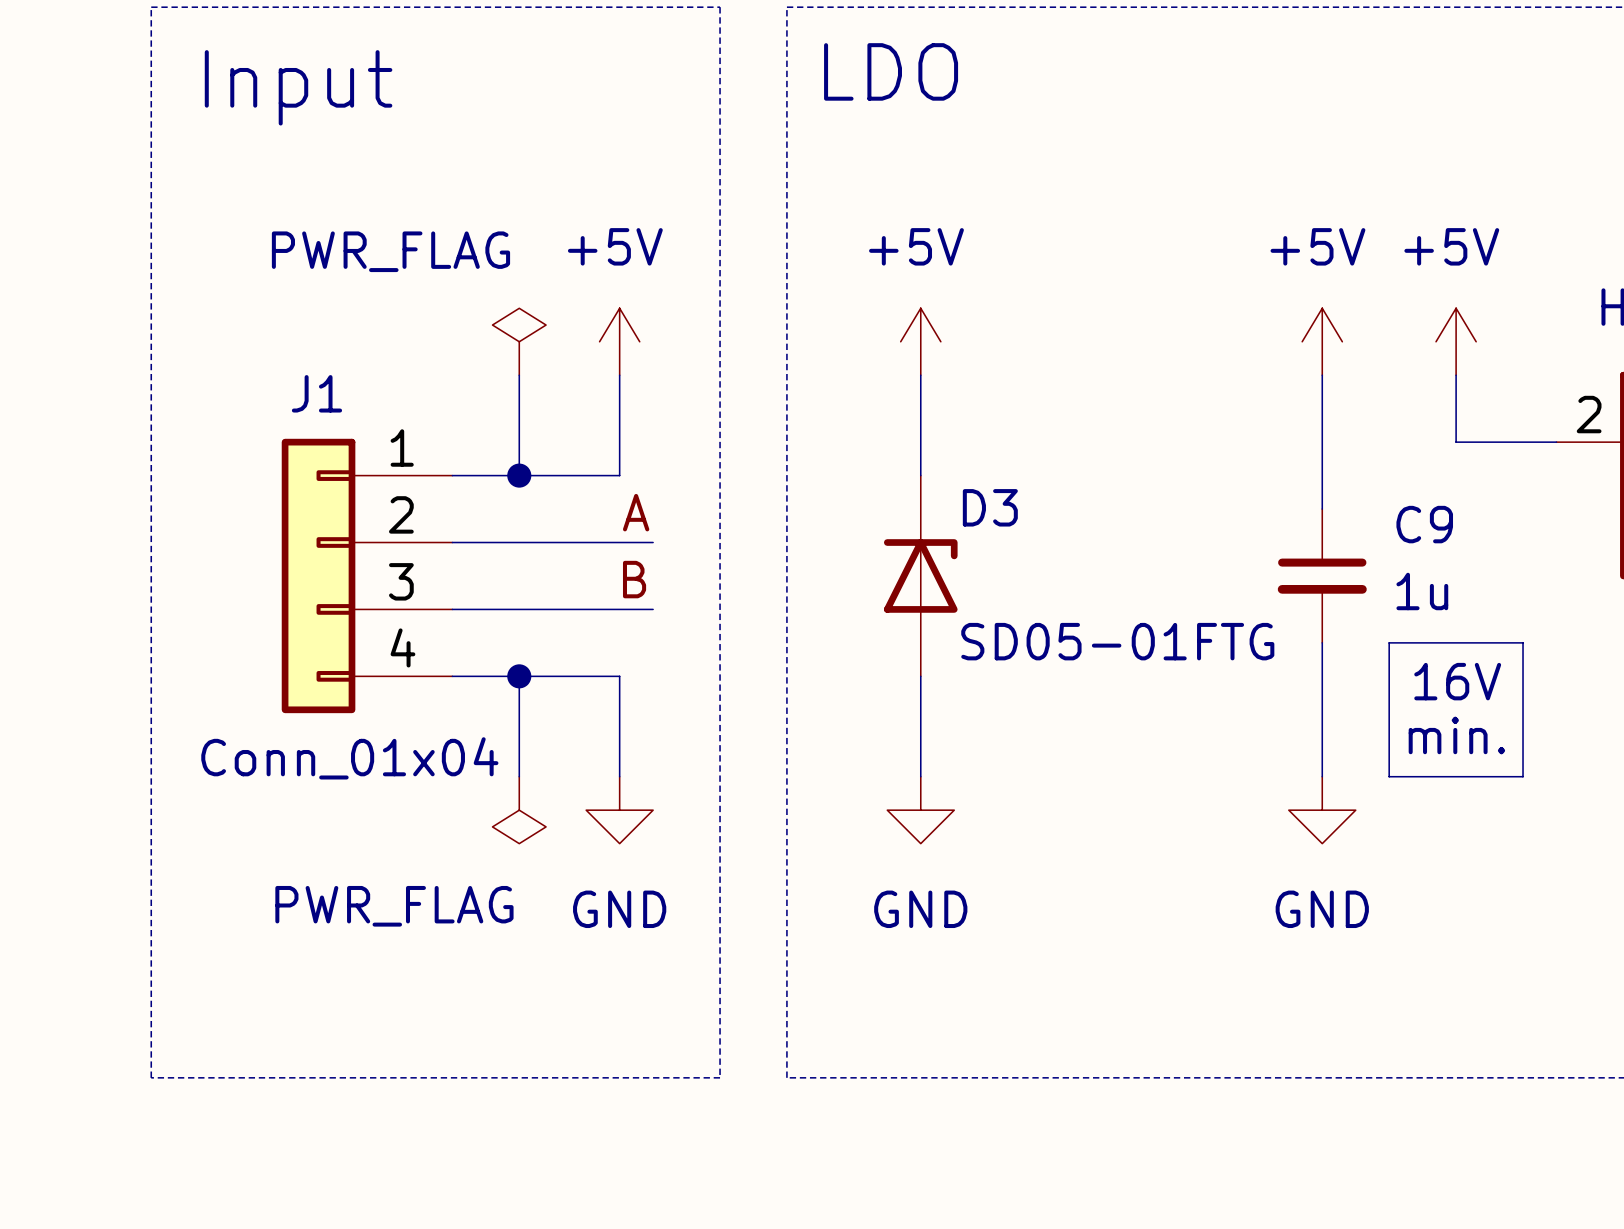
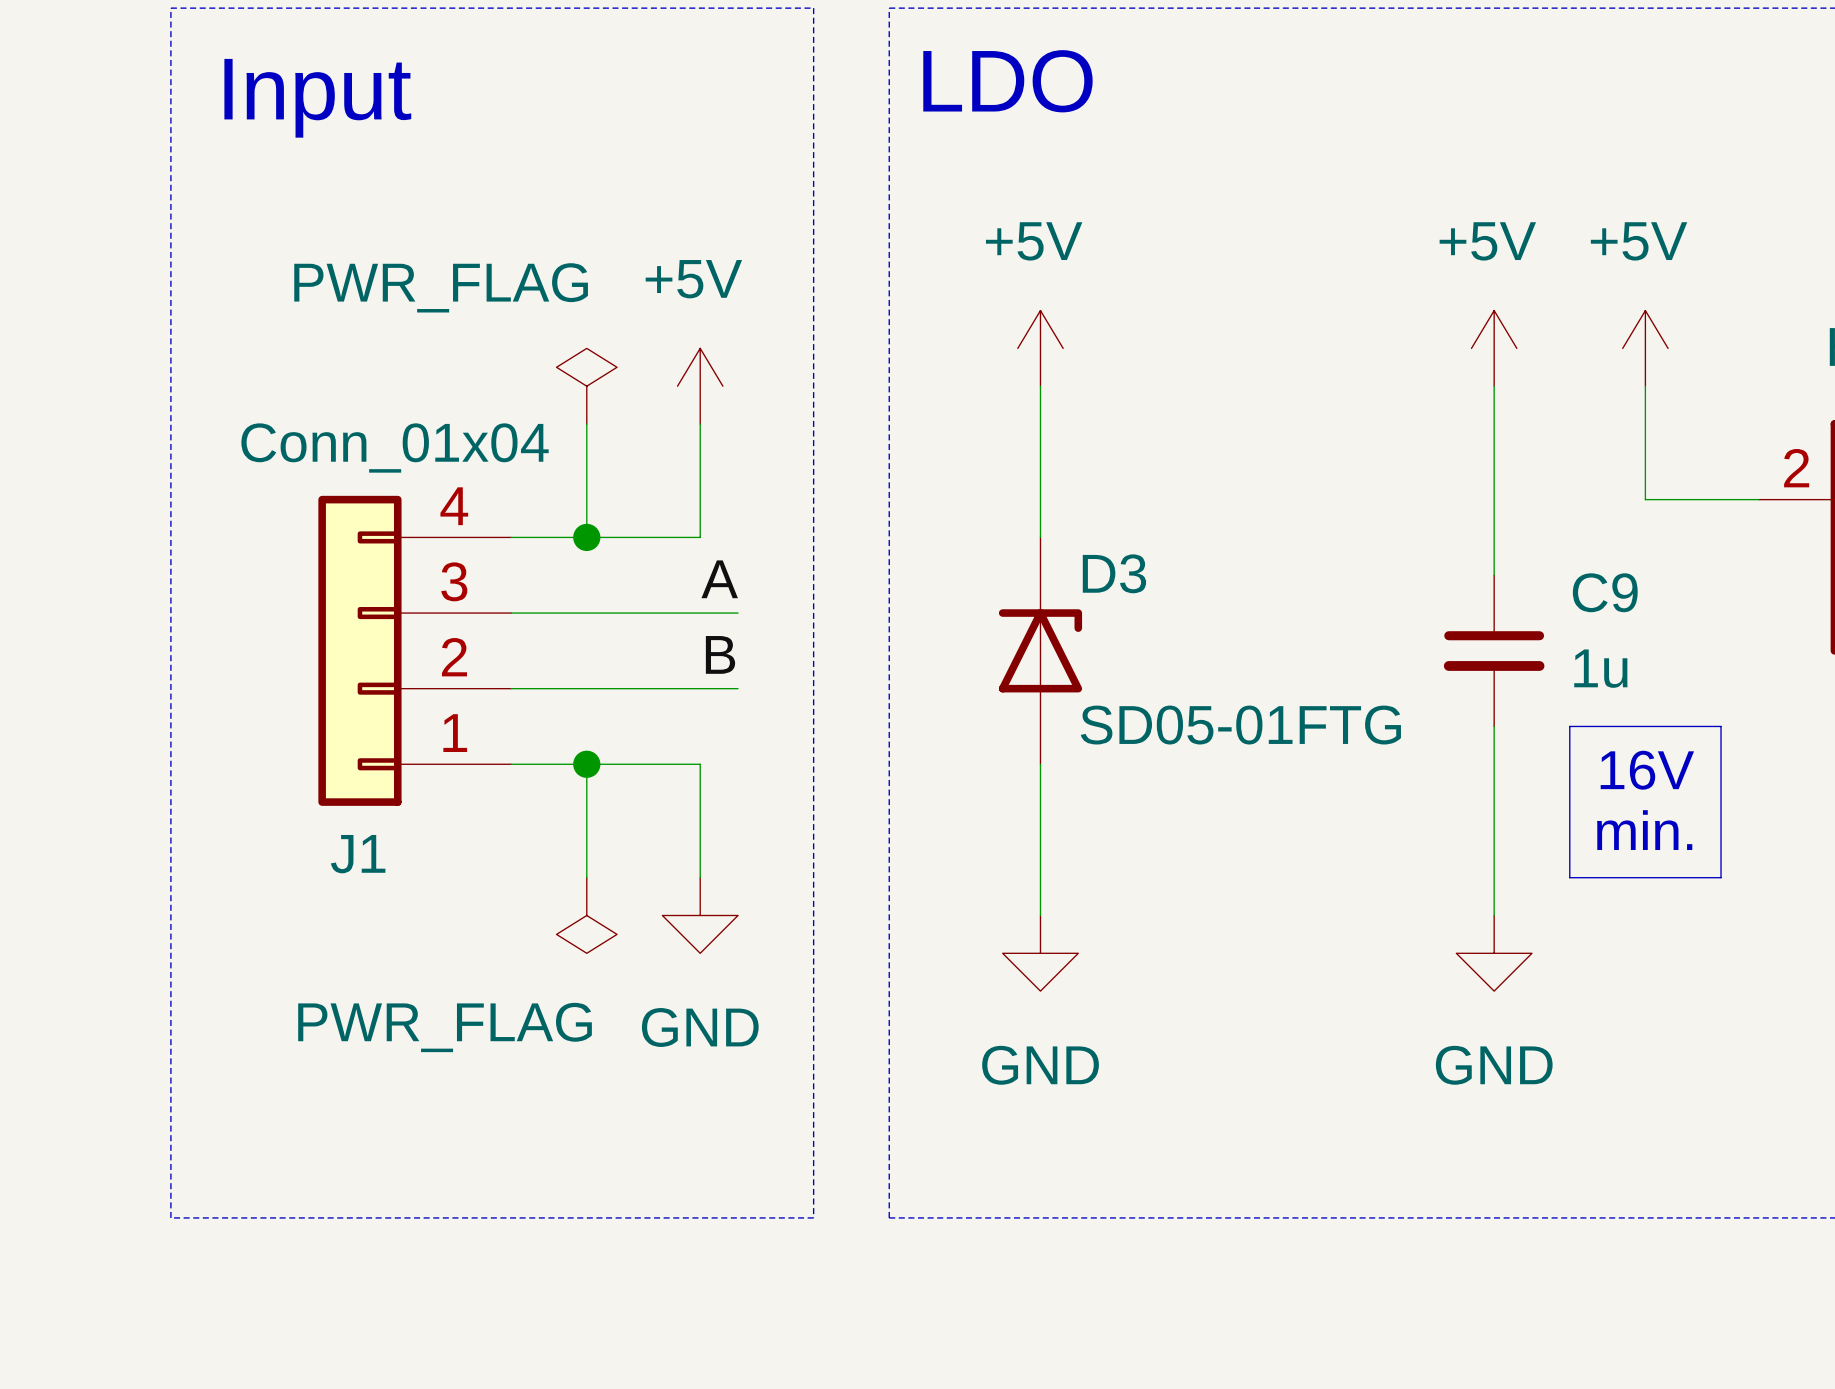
power symbol position: +5V (920, 341) -> +5V (1040, 348)
power symbol position: +5V (1322, 341) -> +5V (1494, 348)
power symbol position: +5V (1456, 341) -> +5V (1645, 348)
J1 flip: as is (318, 575) -> up-down (359, 650)
power symbol position: GND (920, 810) -> GND (1040, 953)
power symbol position: GND (1322, 810) -> GND (1494, 953)

